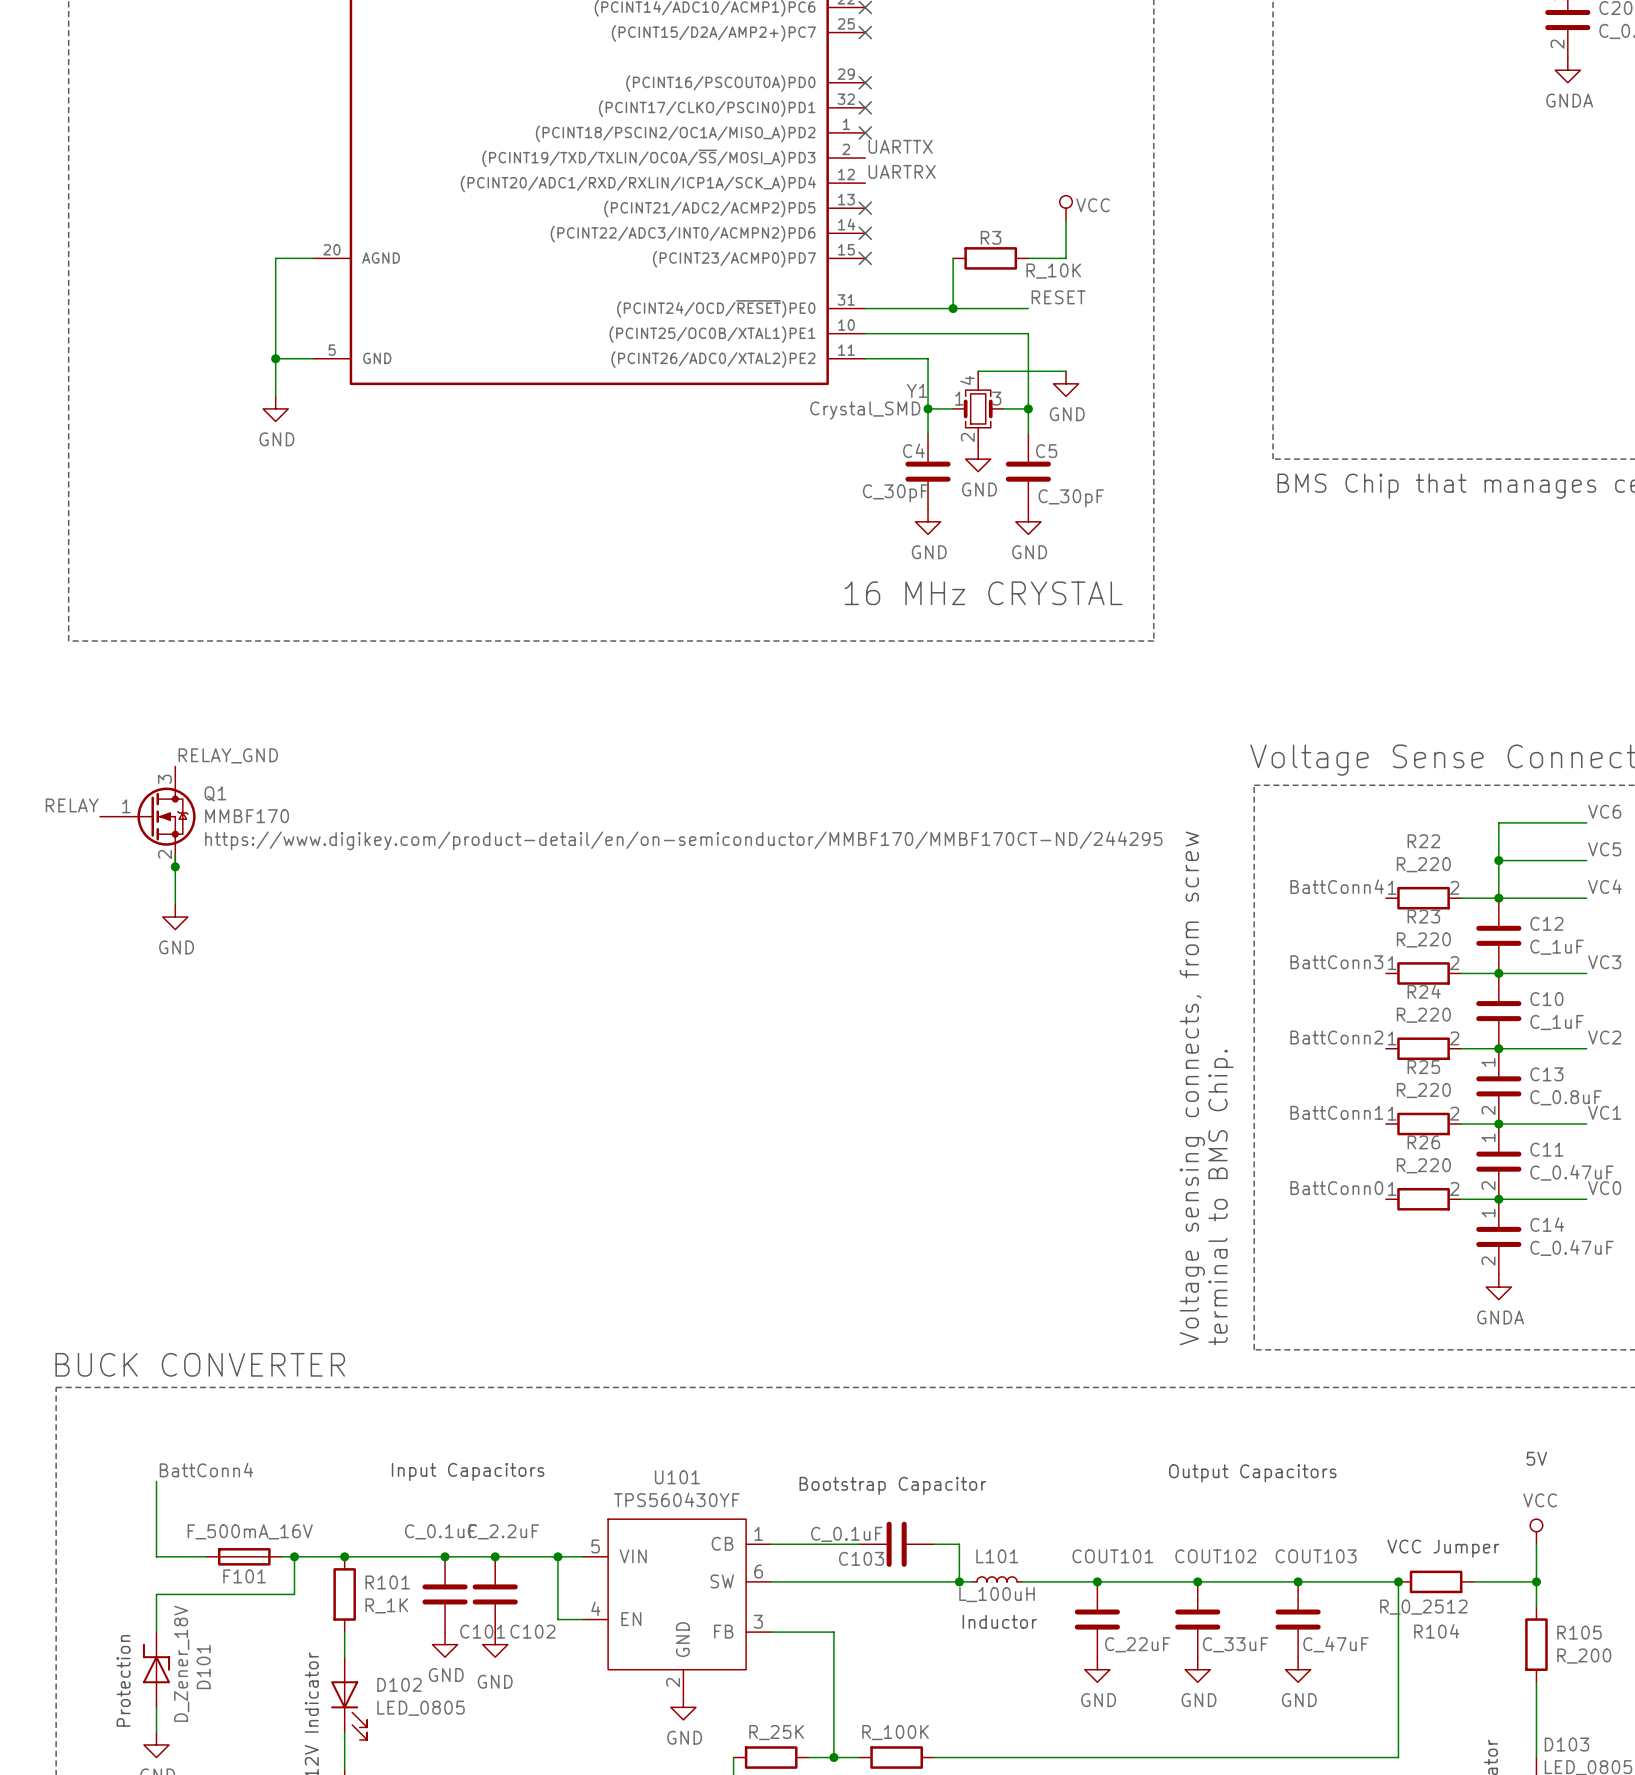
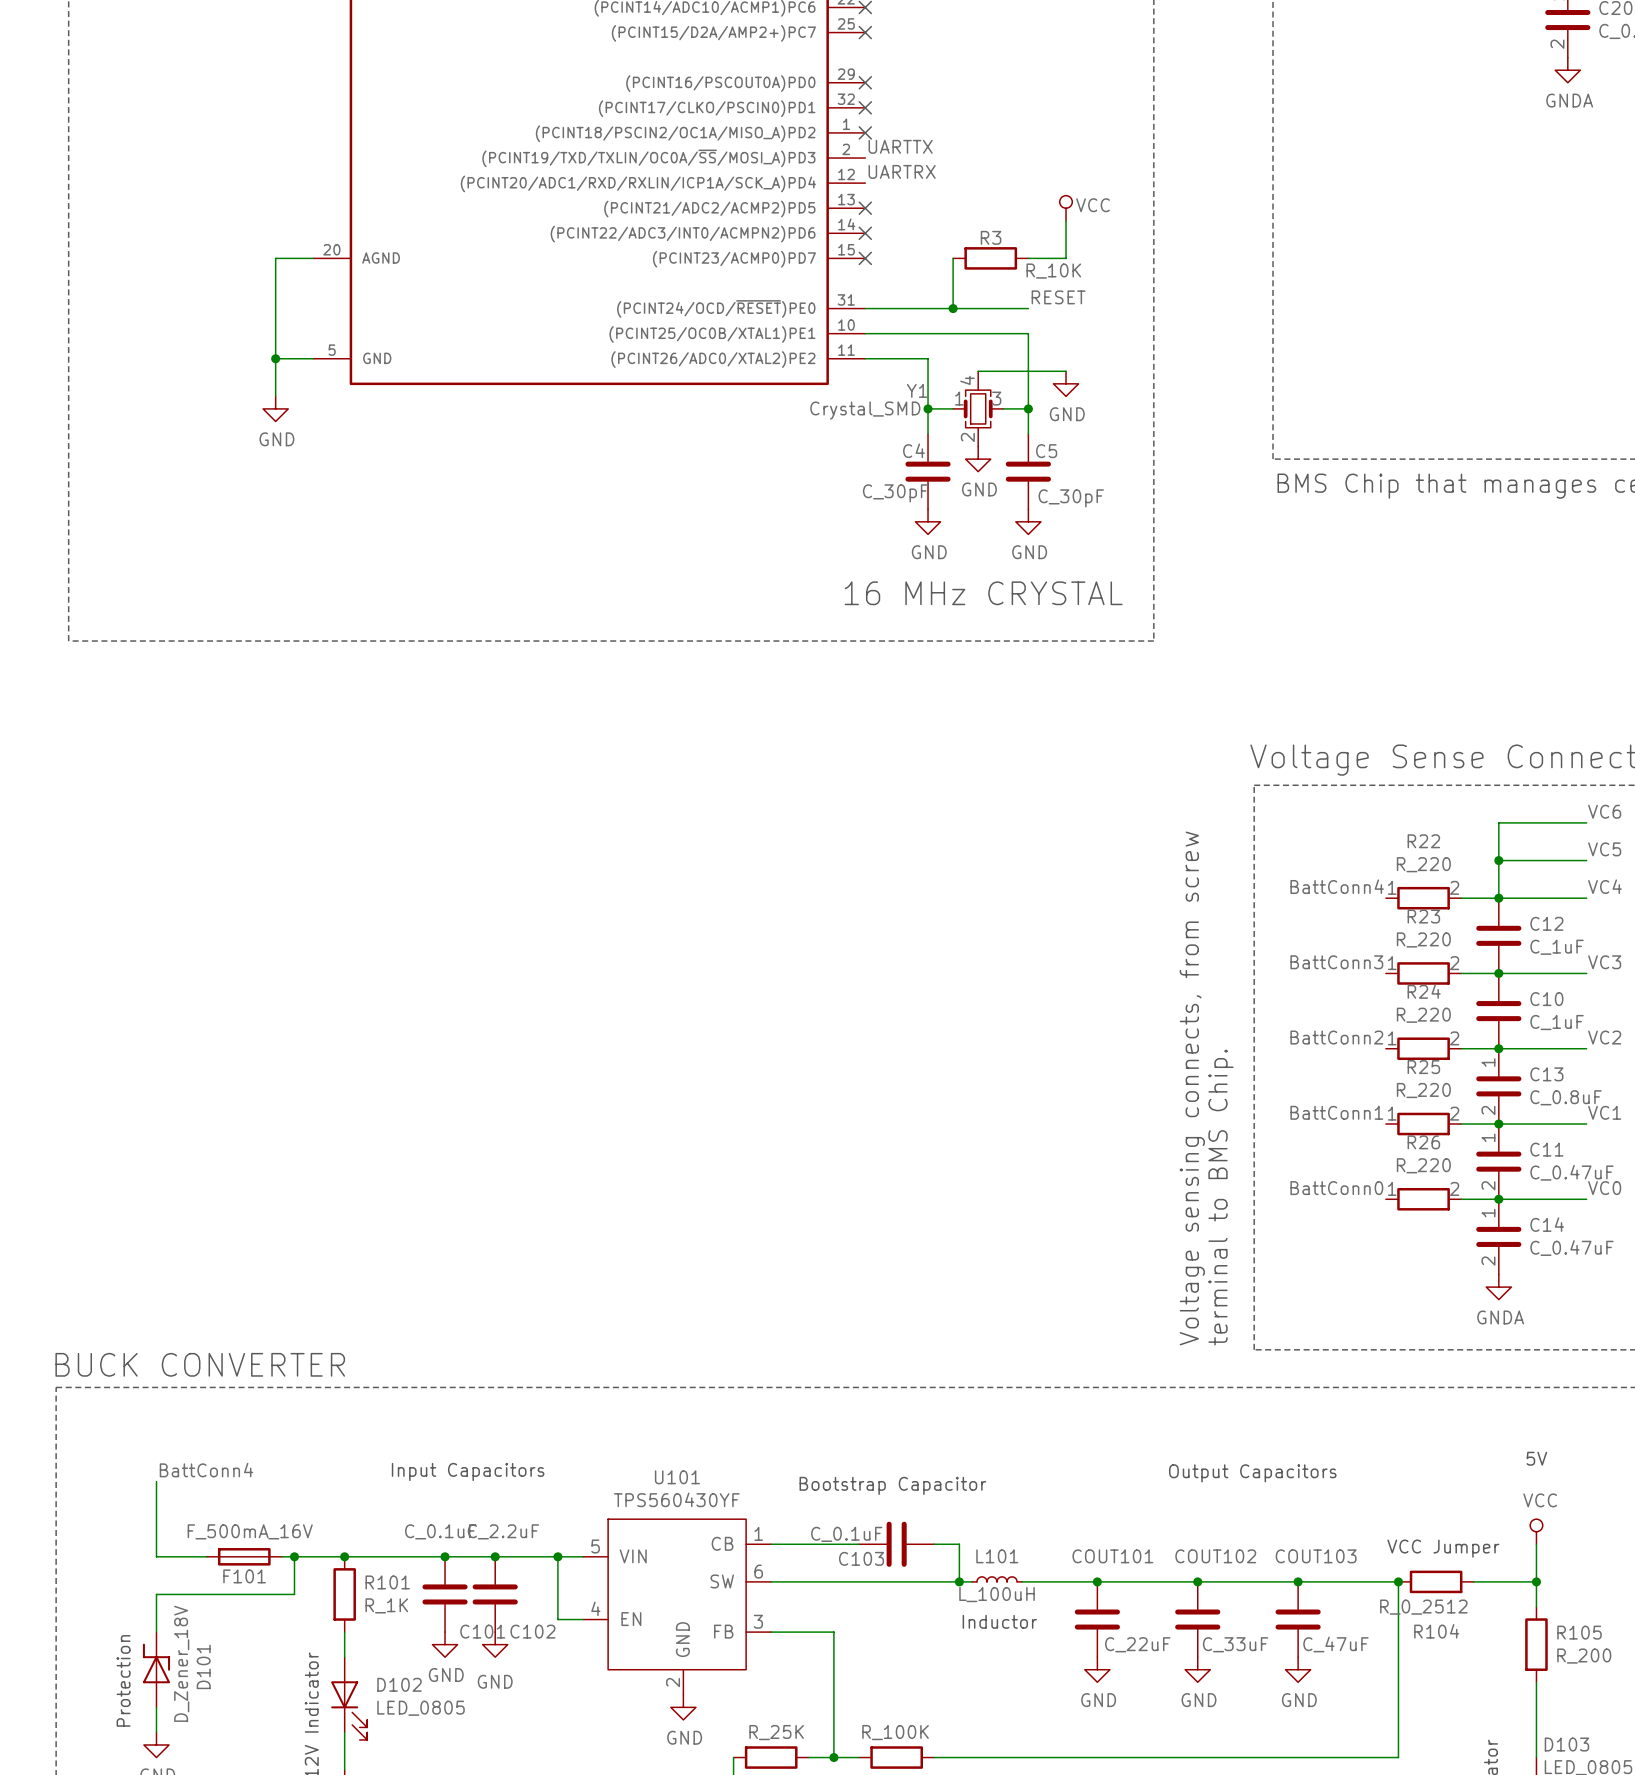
label: RELAY_GND (228, 755) -> none
label: RELAY (72, 805) -> none
Q1: MMBF170 (147, 816) -> none
wire: (175, 854) (175, 904) -> none
junction: (175, 866) -> none
power symbol: GND (175, 917) -> none

